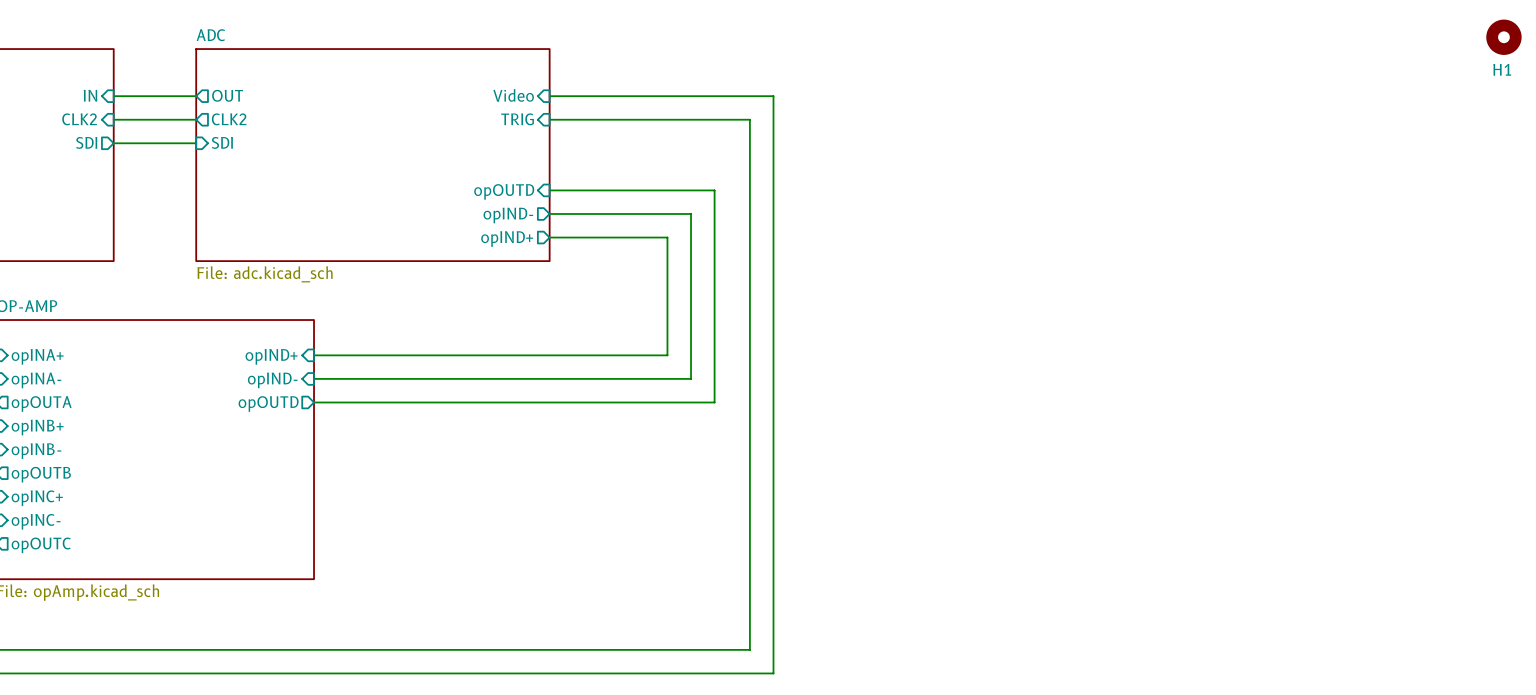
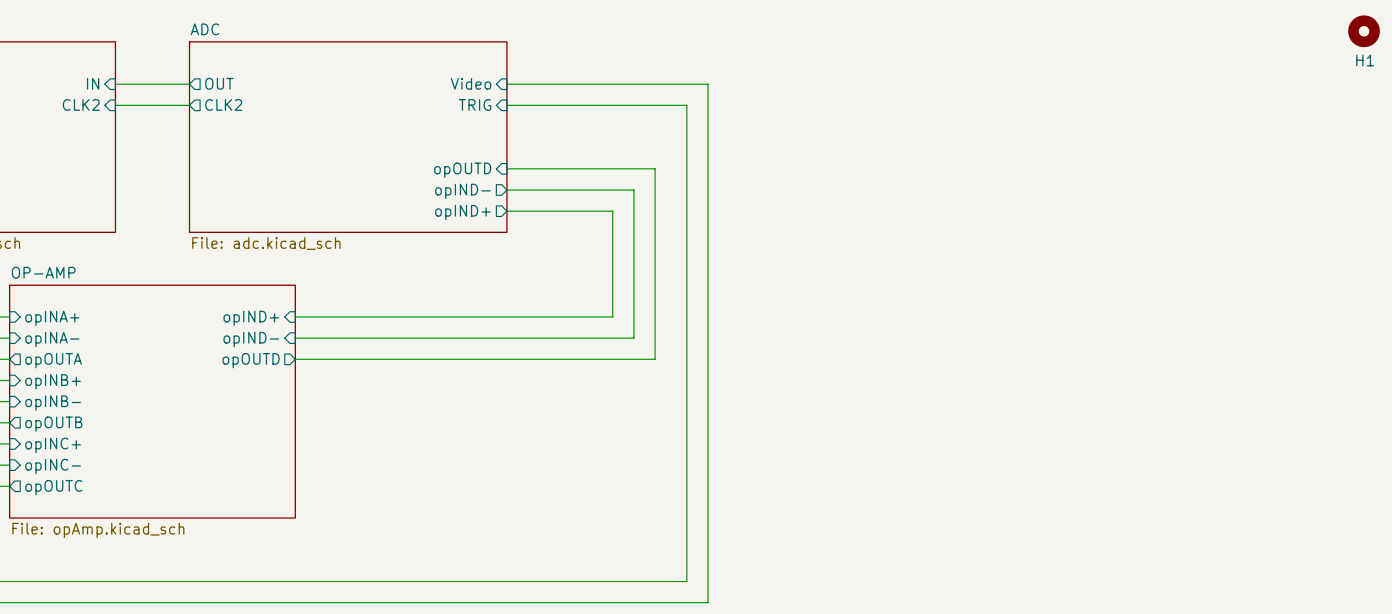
sheet pin: SDI (86, 142) -> none
sheet pin: SDI (222, 142) -> none
wire: (113, 143) (196, 143) -> none

